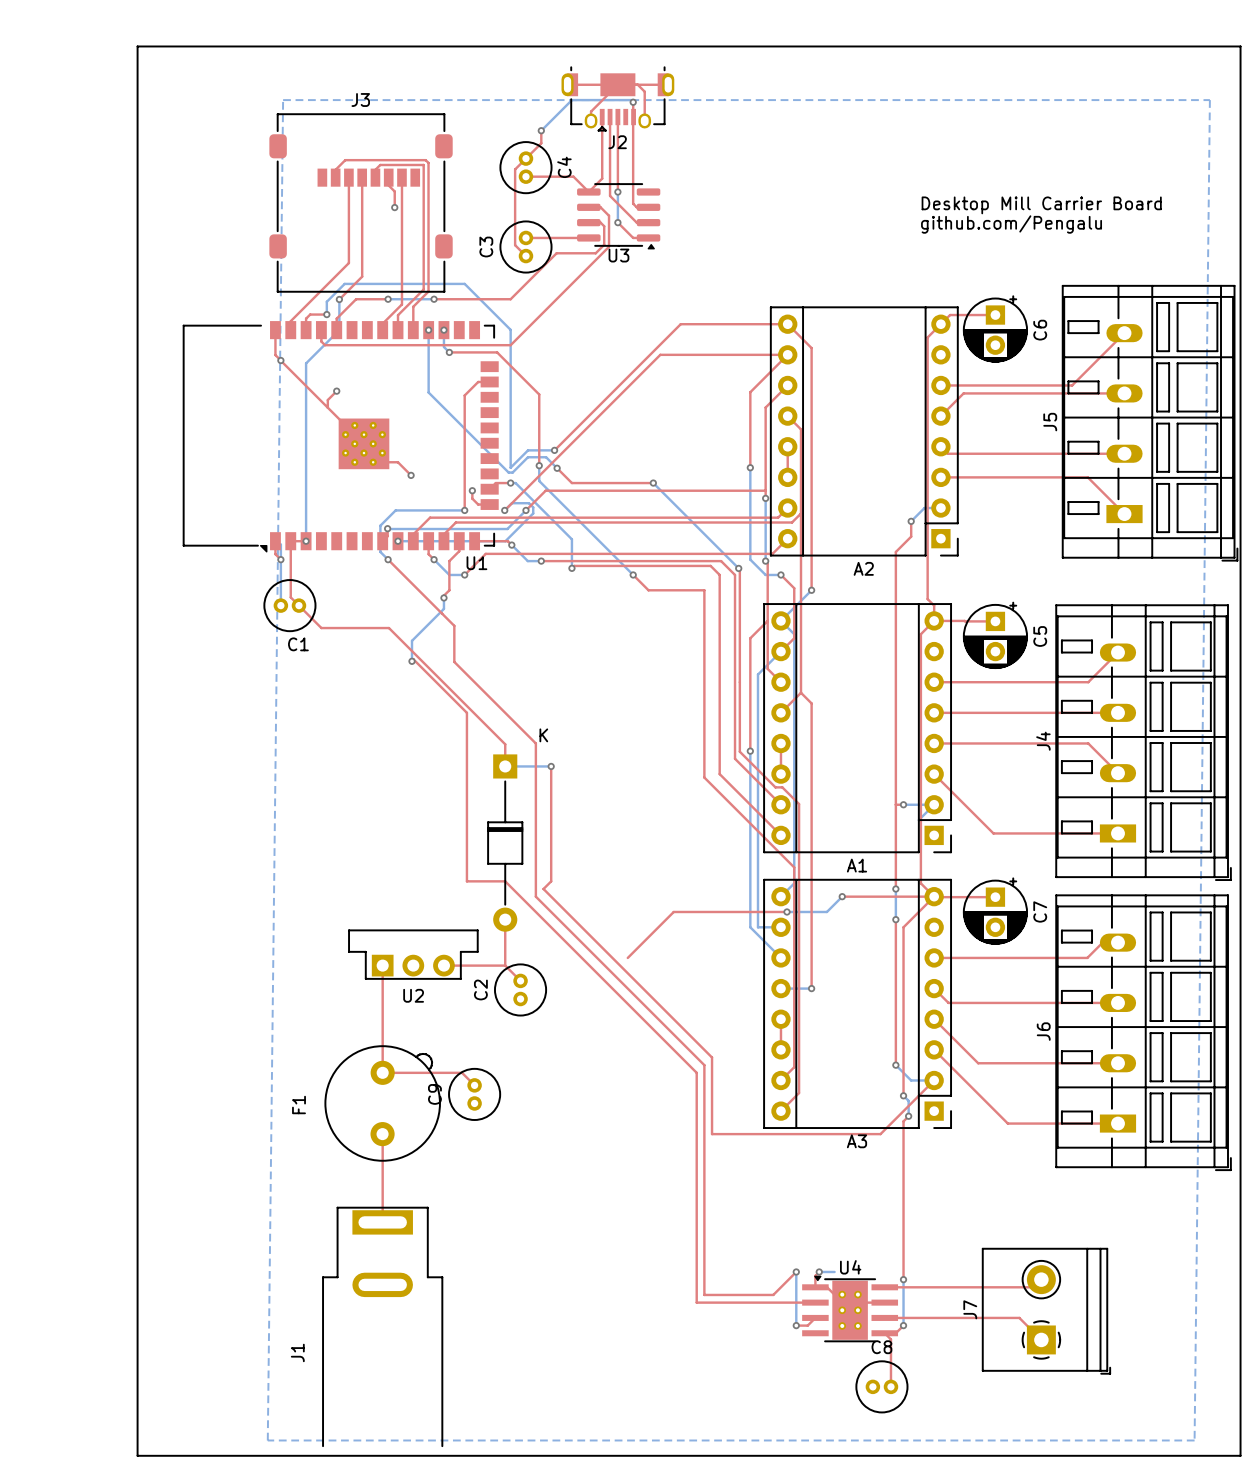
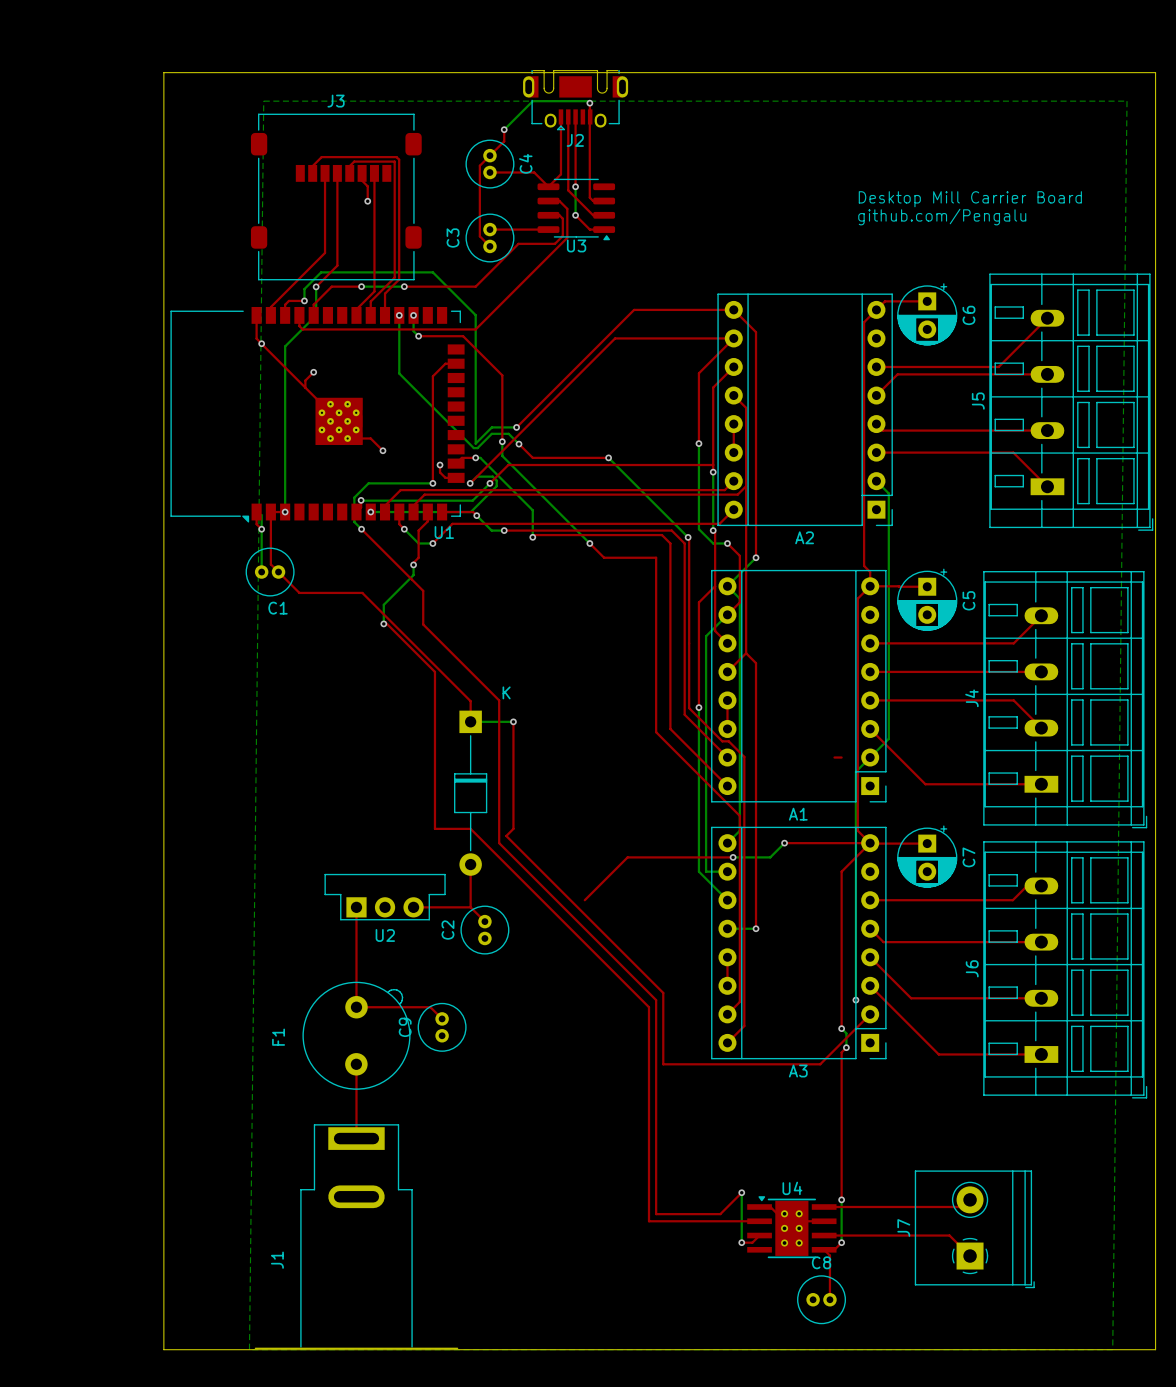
J2 footprint: [561, 66, 675, 132] -> [523, 69, 629, 131]
board edge: (1240, 69) (1240, 46) (137, 46) (137, 1455) (1240, 1455) (1240, 1440) -> (1155, 72) (163, 72) (163, 1349) (1155, 1349)
top track: (572, 84) (662, 84) -> none
top track: (617, 84) (591, 111) (591, 120) -> none
top track: (637, 84) (644, 91) (644, 120) -> none
bottom track: (940, 508) (924, 508) (911, 521) -> (876, 481) (888, 493) (888, 738) (870, 757)
top track: (911, 521) (911, 536) (895, 551) (895, 889) -> none
via: (911, 521) -> none
bottom track: (903, 804) (934, 804) -> none
via: (903, 804) -> none
bottom track: none -> (855, 771) (855, 1000)
bottom track: (895, 889) (895, 919) -> none
via: (895, 889) -> none
top track: (895, 919) (895, 1065) -> none
via: (895, 919) -> none
bottom track: (895, 1065) (911, 1080) (934, 1080) -> none
via position: (895, 1065) -> (855, 1000)
J1 footprint: [322, 1206, 444, 1447] -> [254, 1124, 459, 1350]
top track: (819, 1271) (815, 1275) (815, 1287) -> none
bottom track: (819, 1271) (834, 1271) -> none
via: (819, 1271) -> none

